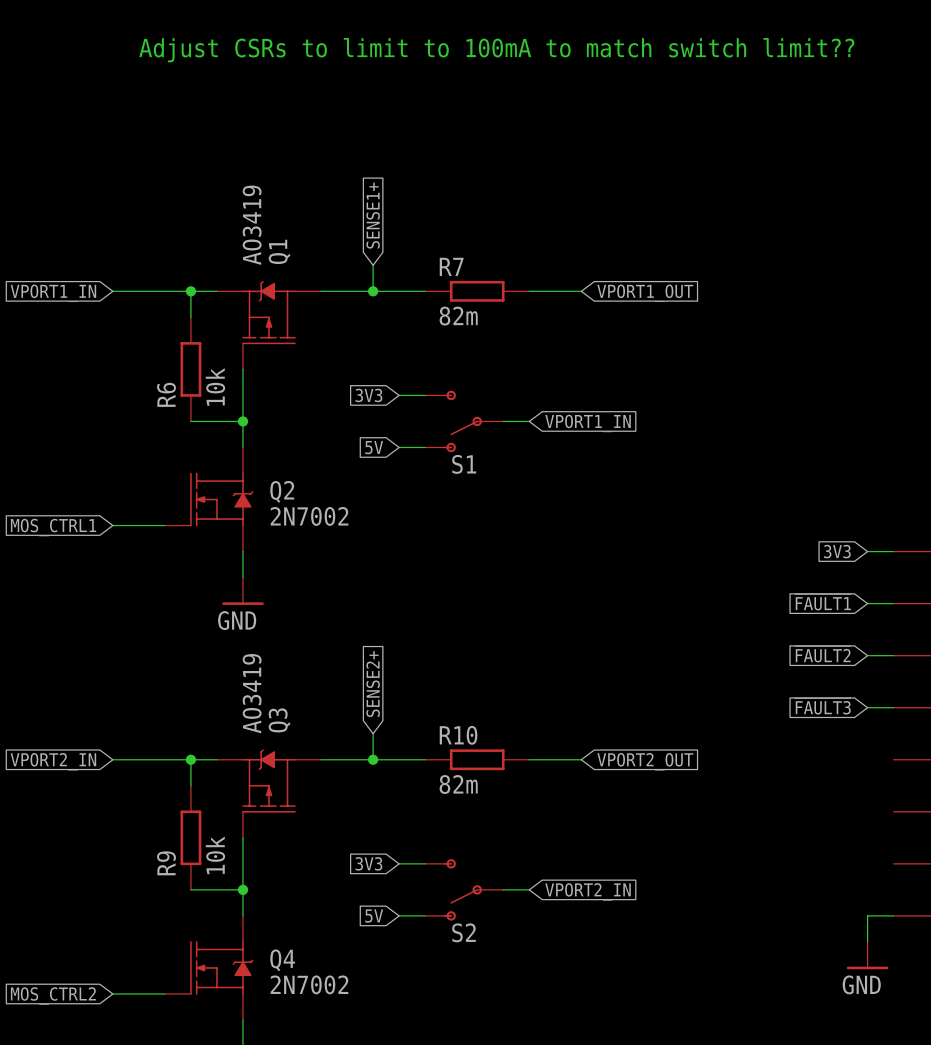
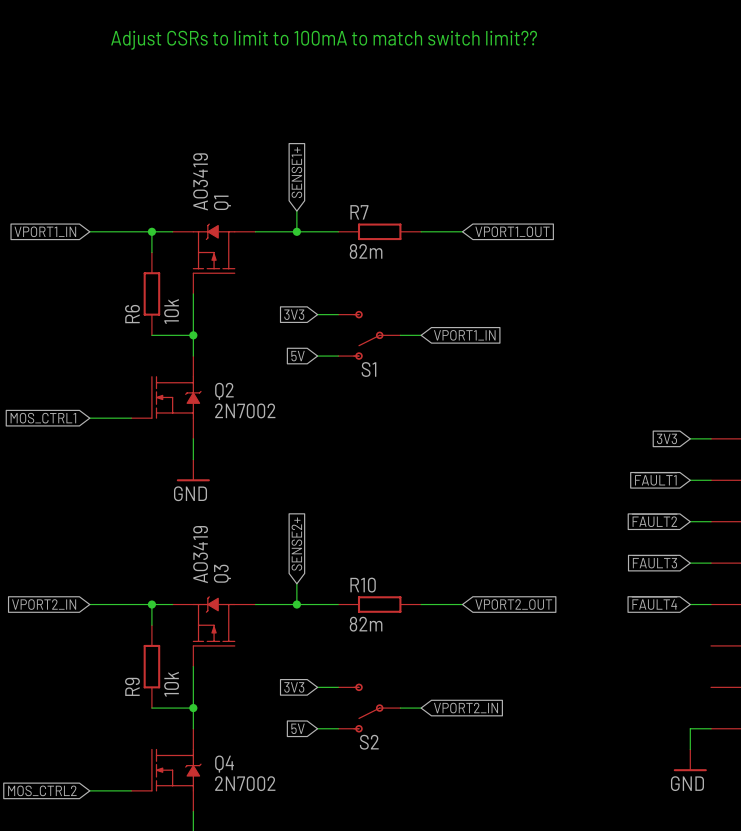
global label: none -> ~{FAULT4} (654, 603)
wire: none -> (690, 604) (711, 604)

